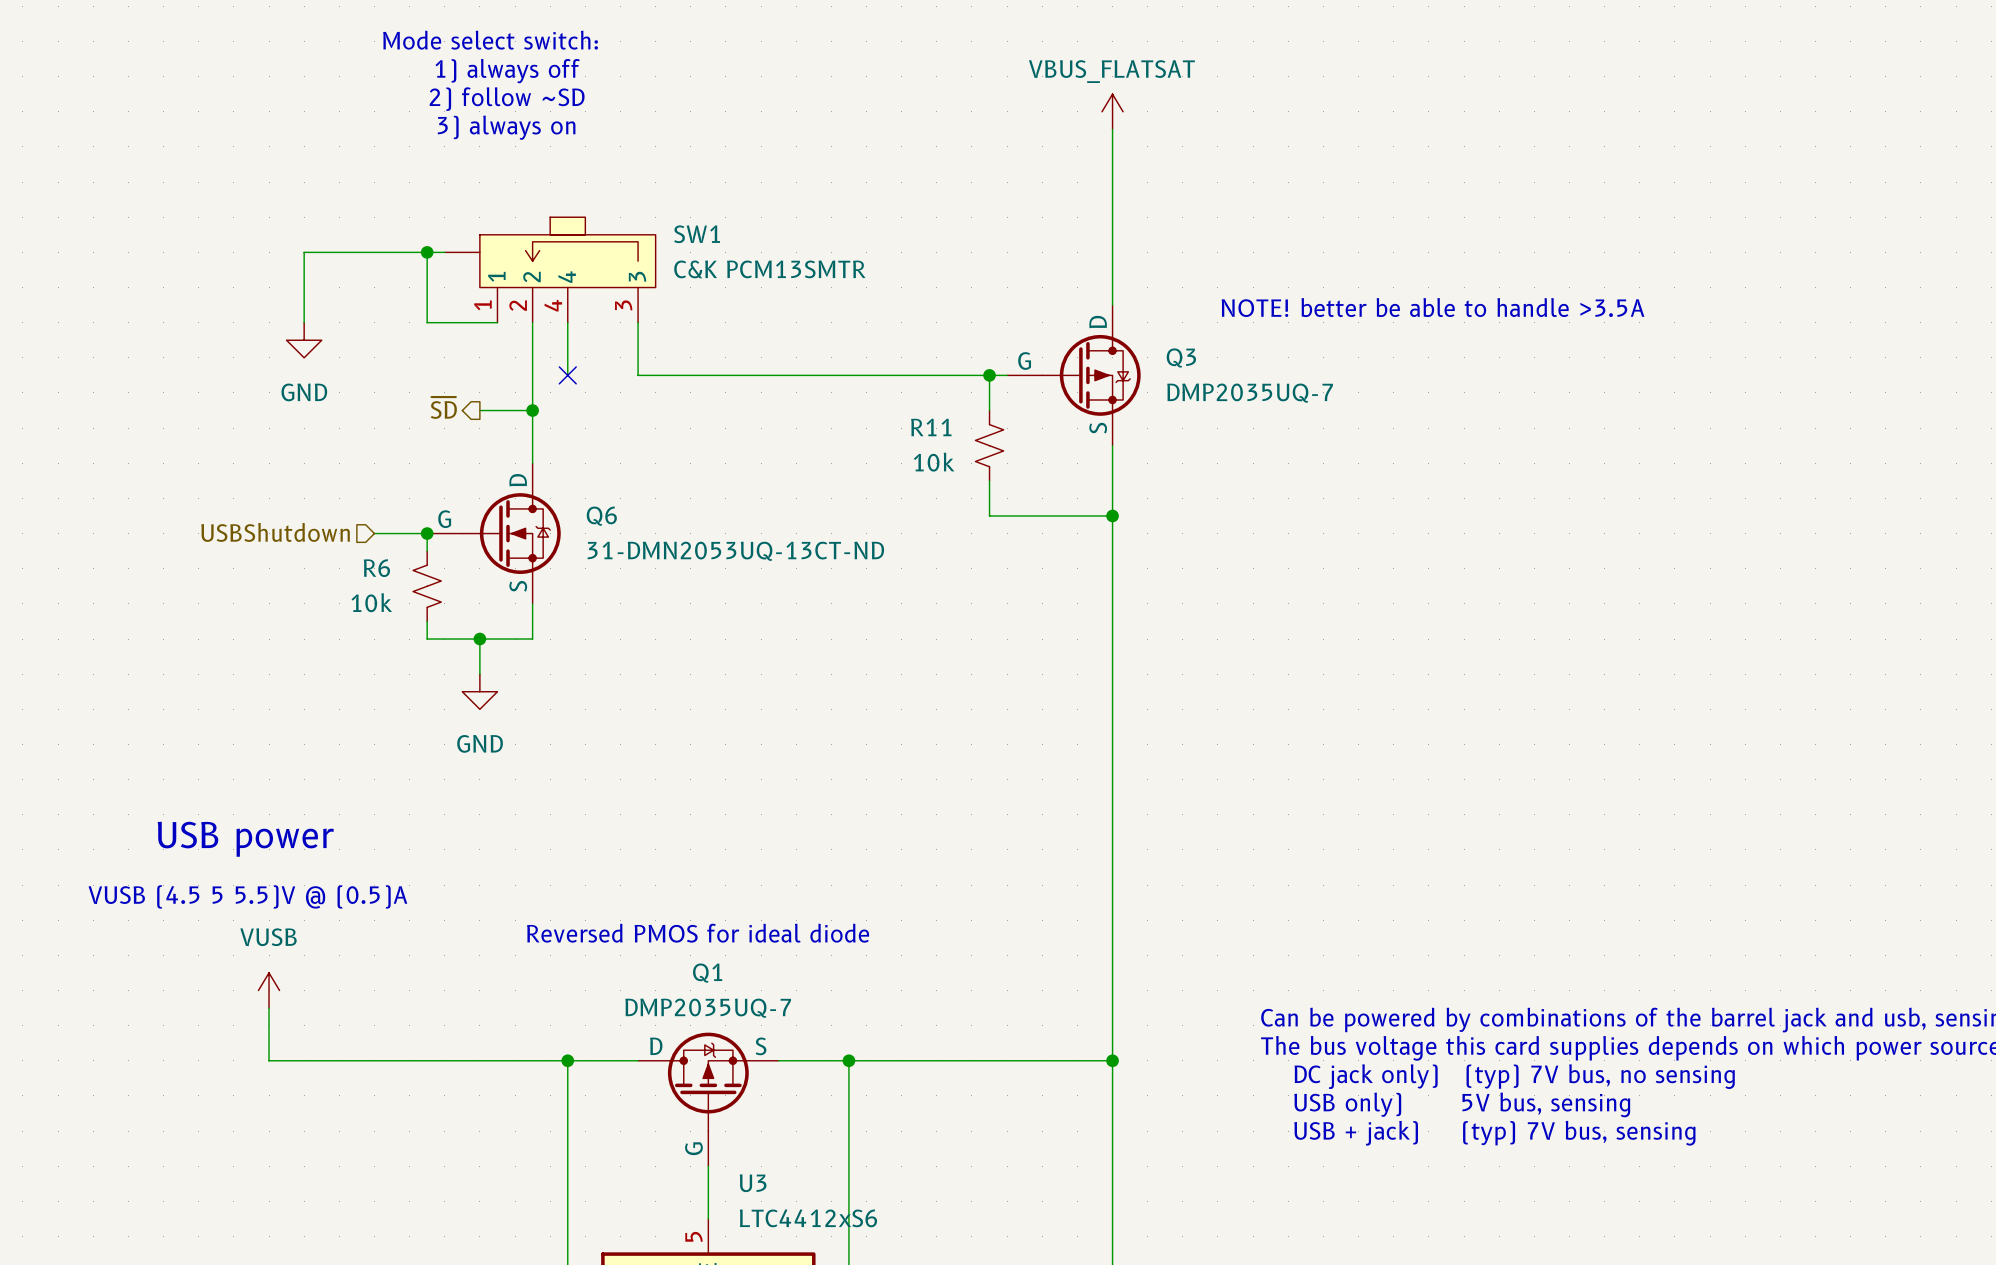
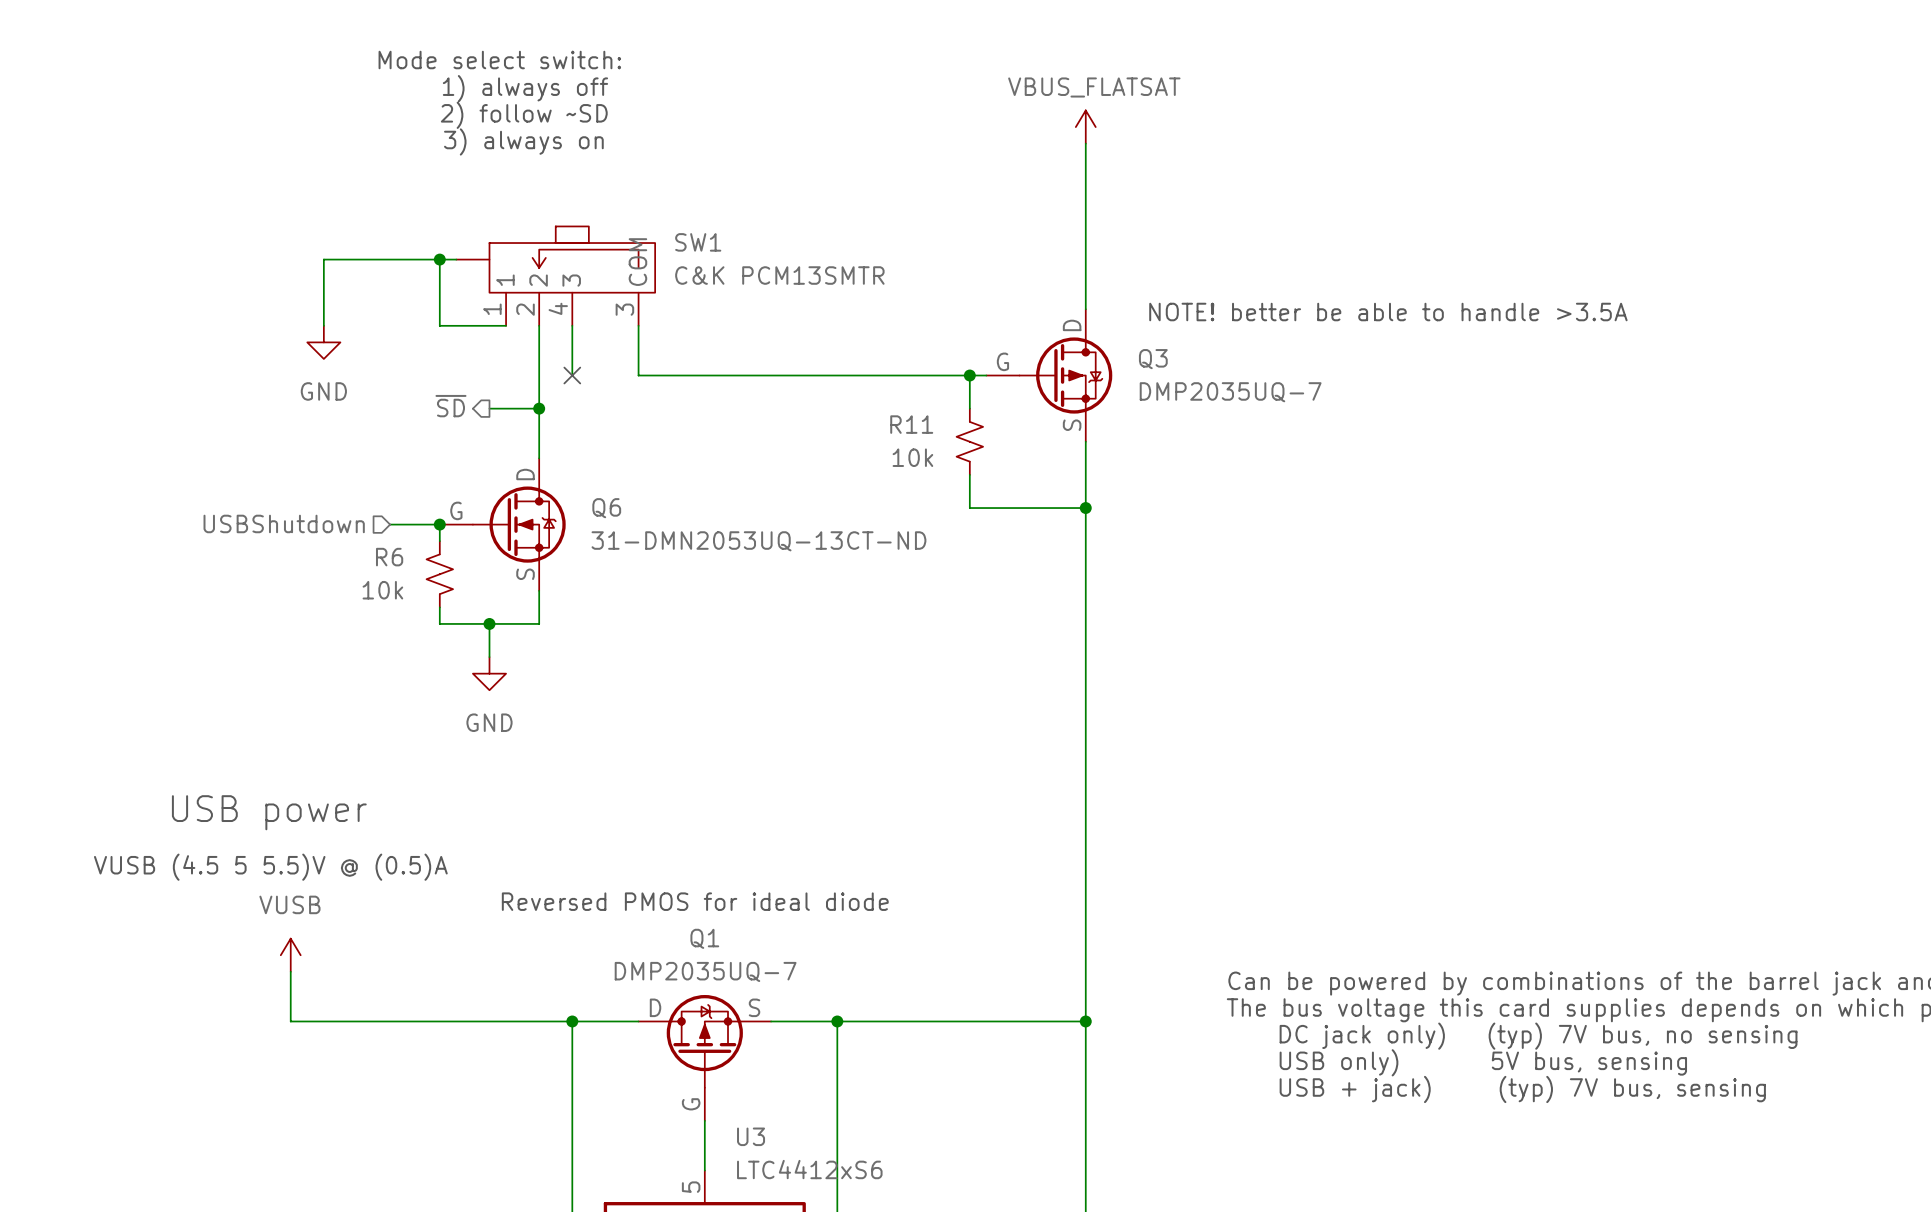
SW1 pin name: 3 (637, 276) -> COM (637, 262)
SW1 pin name: 4 (567, 277) -> 3 (571, 280)

